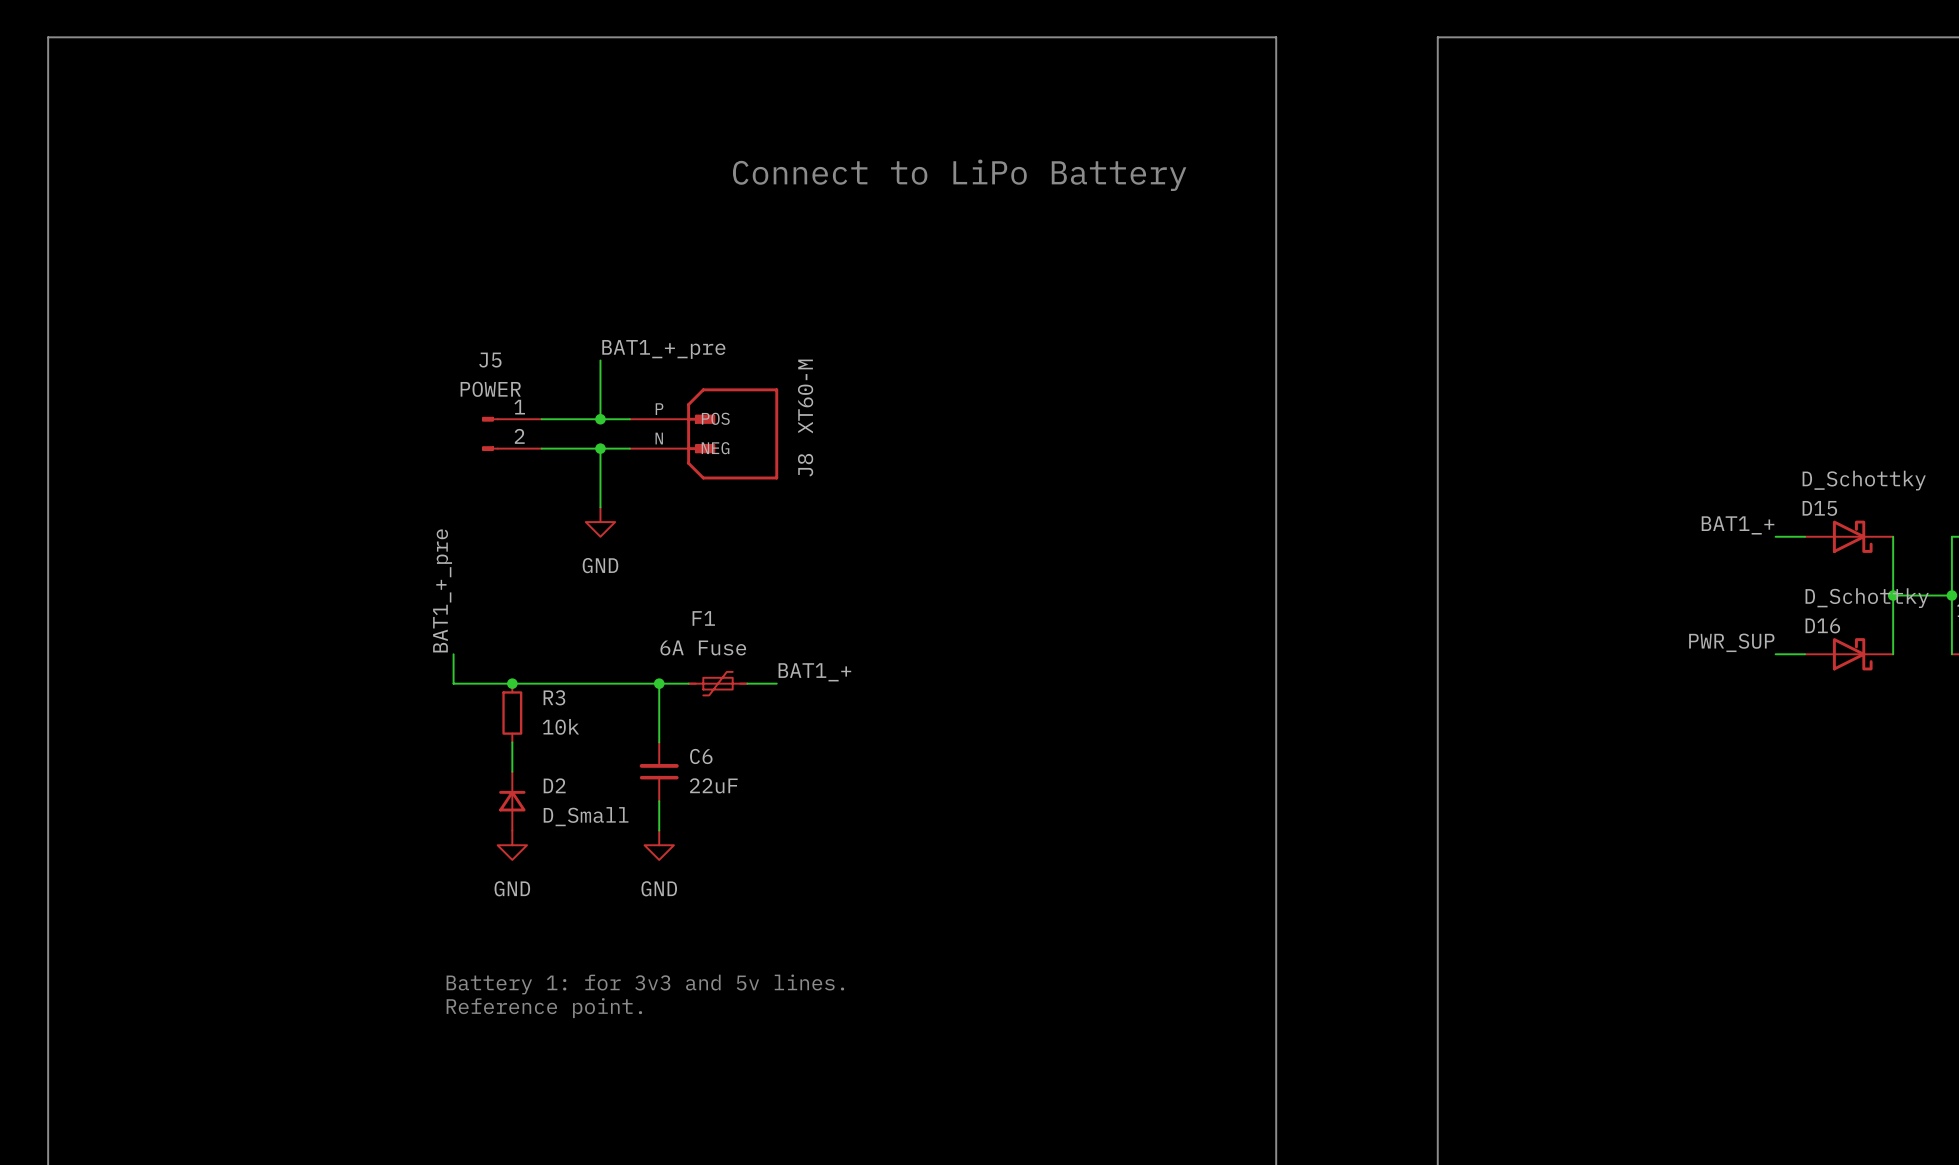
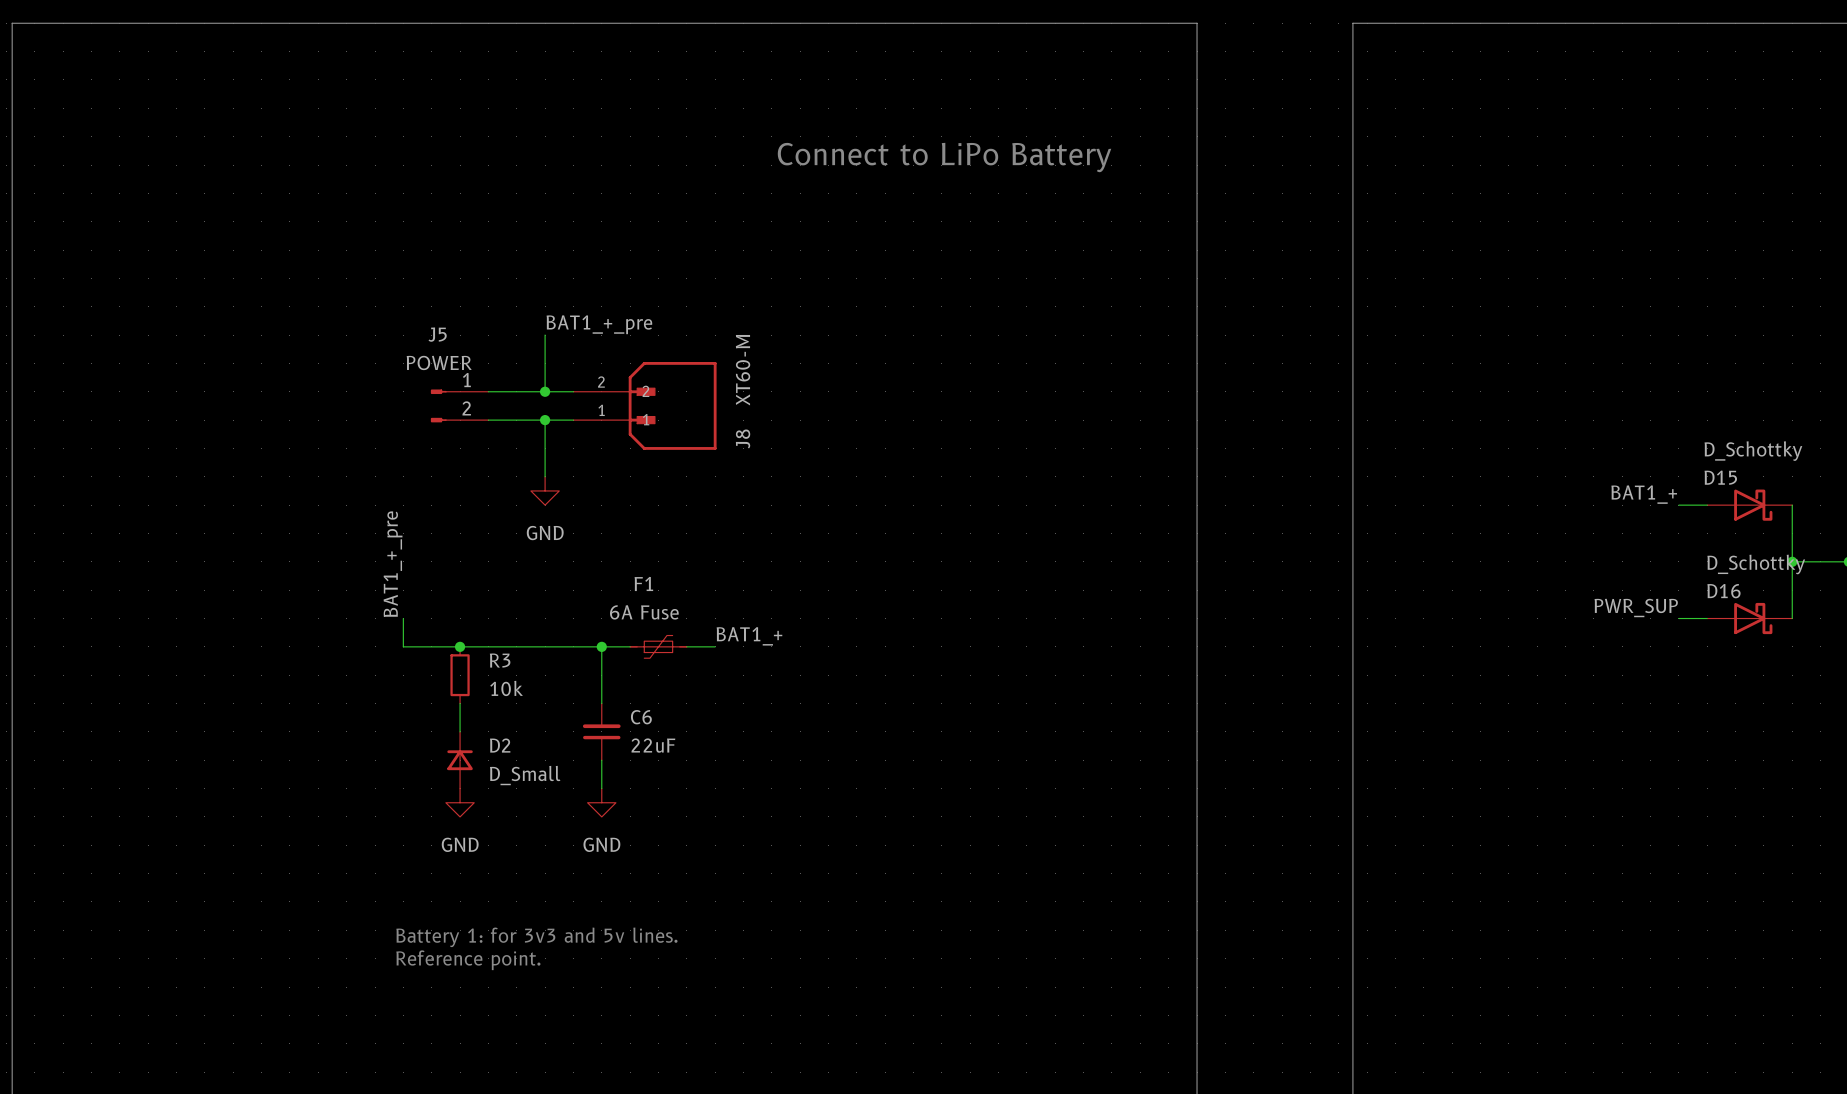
J8 pin number: P (659, 409) -> 2 (601, 382)
J8 pin name: POS (715, 418) -> 2 (645, 391)
J8 pin number: N (659, 438) -> 1 (601, 410)
J8 pin name: NEG (715, 448) -> 1 (646, 419)

